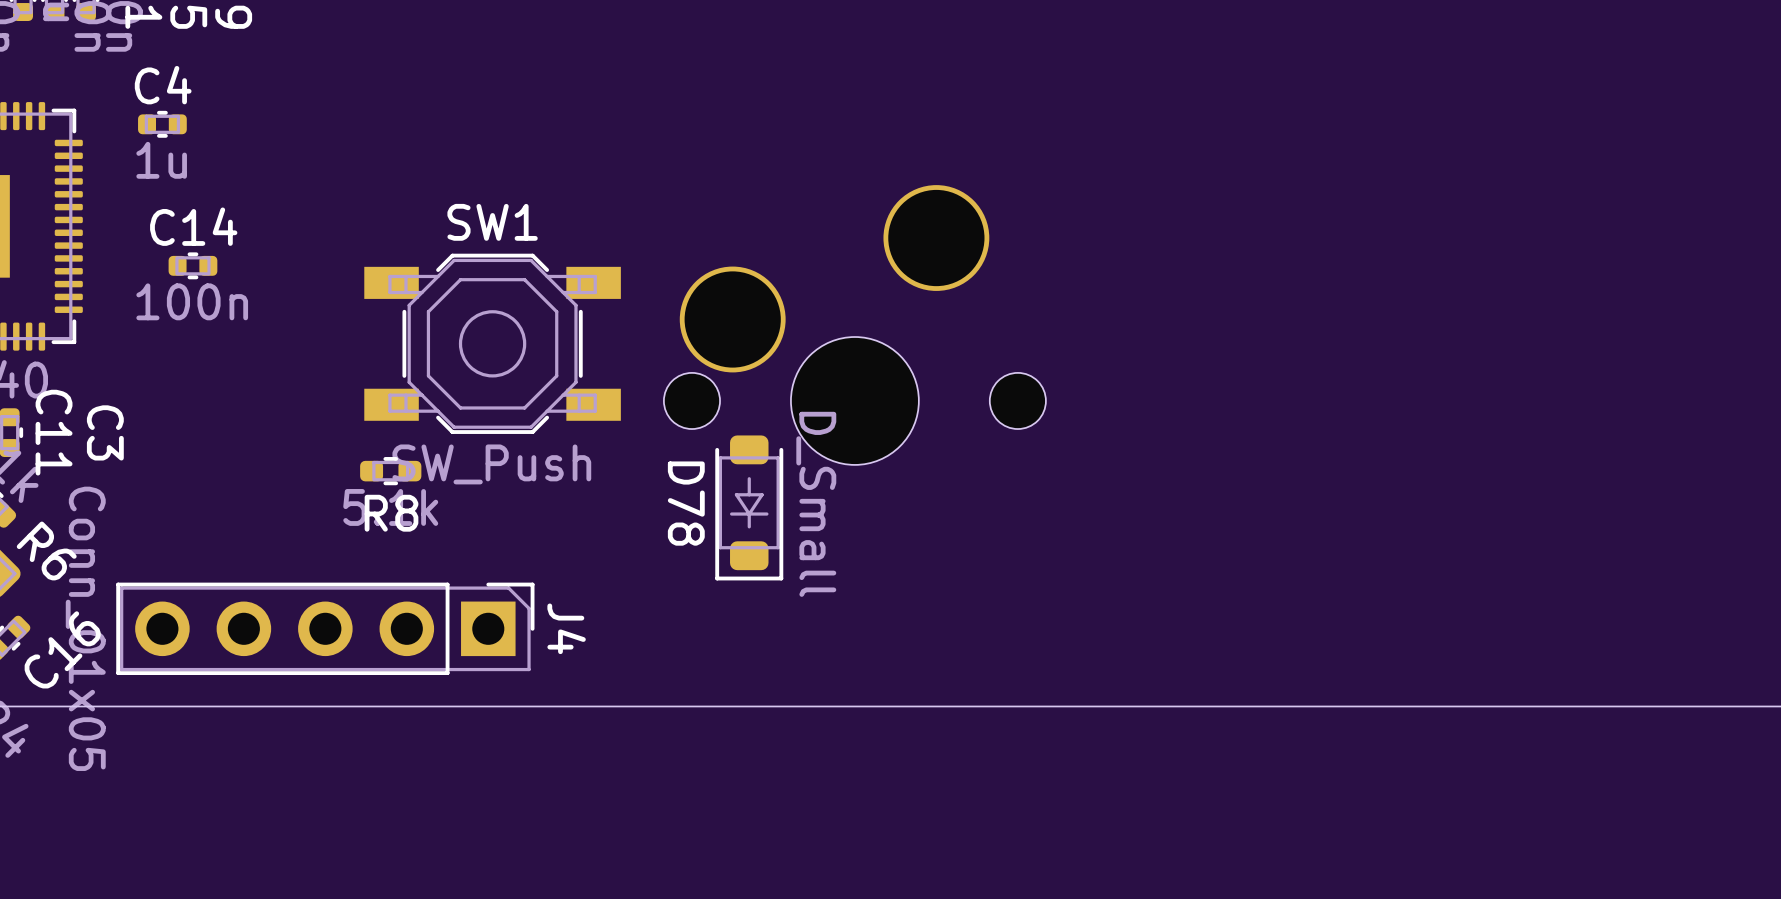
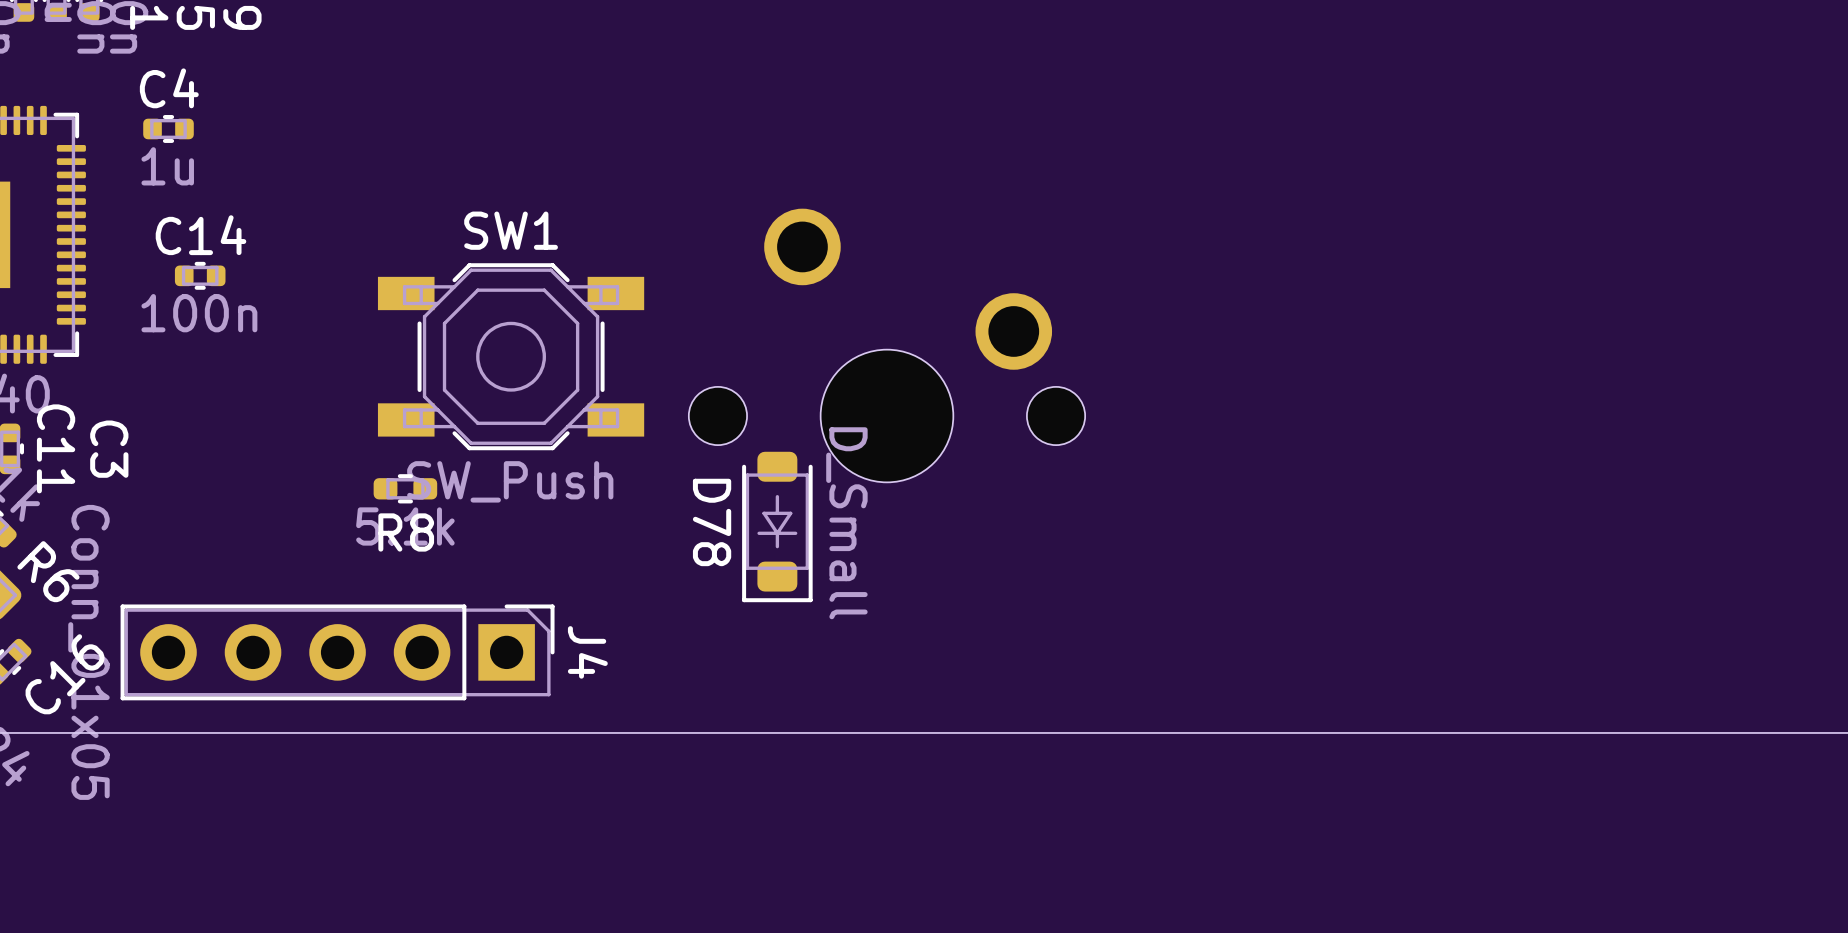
part footprint: [663, 185, 1046, 465] -> [688, 208, 1086, 483]

